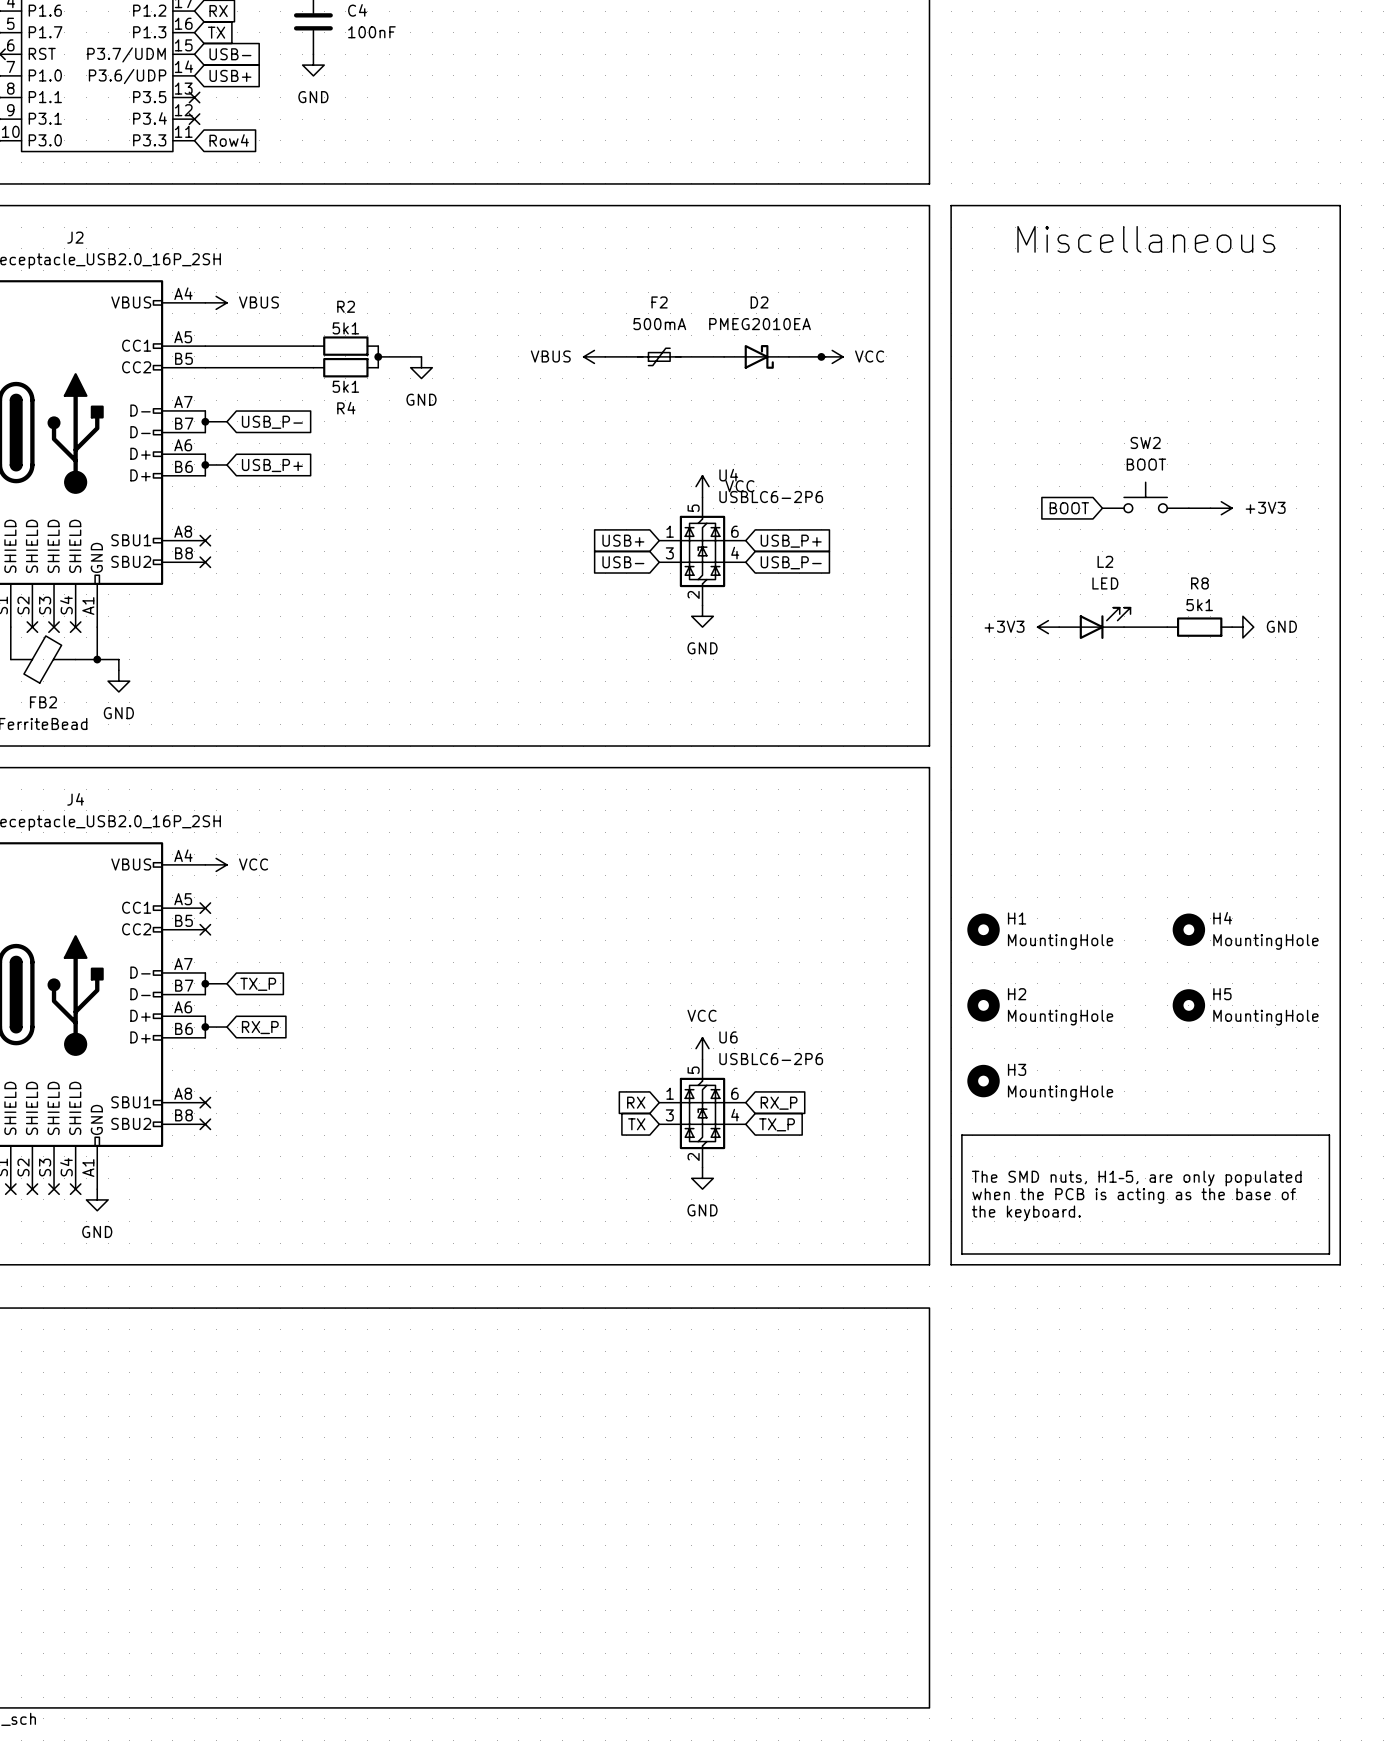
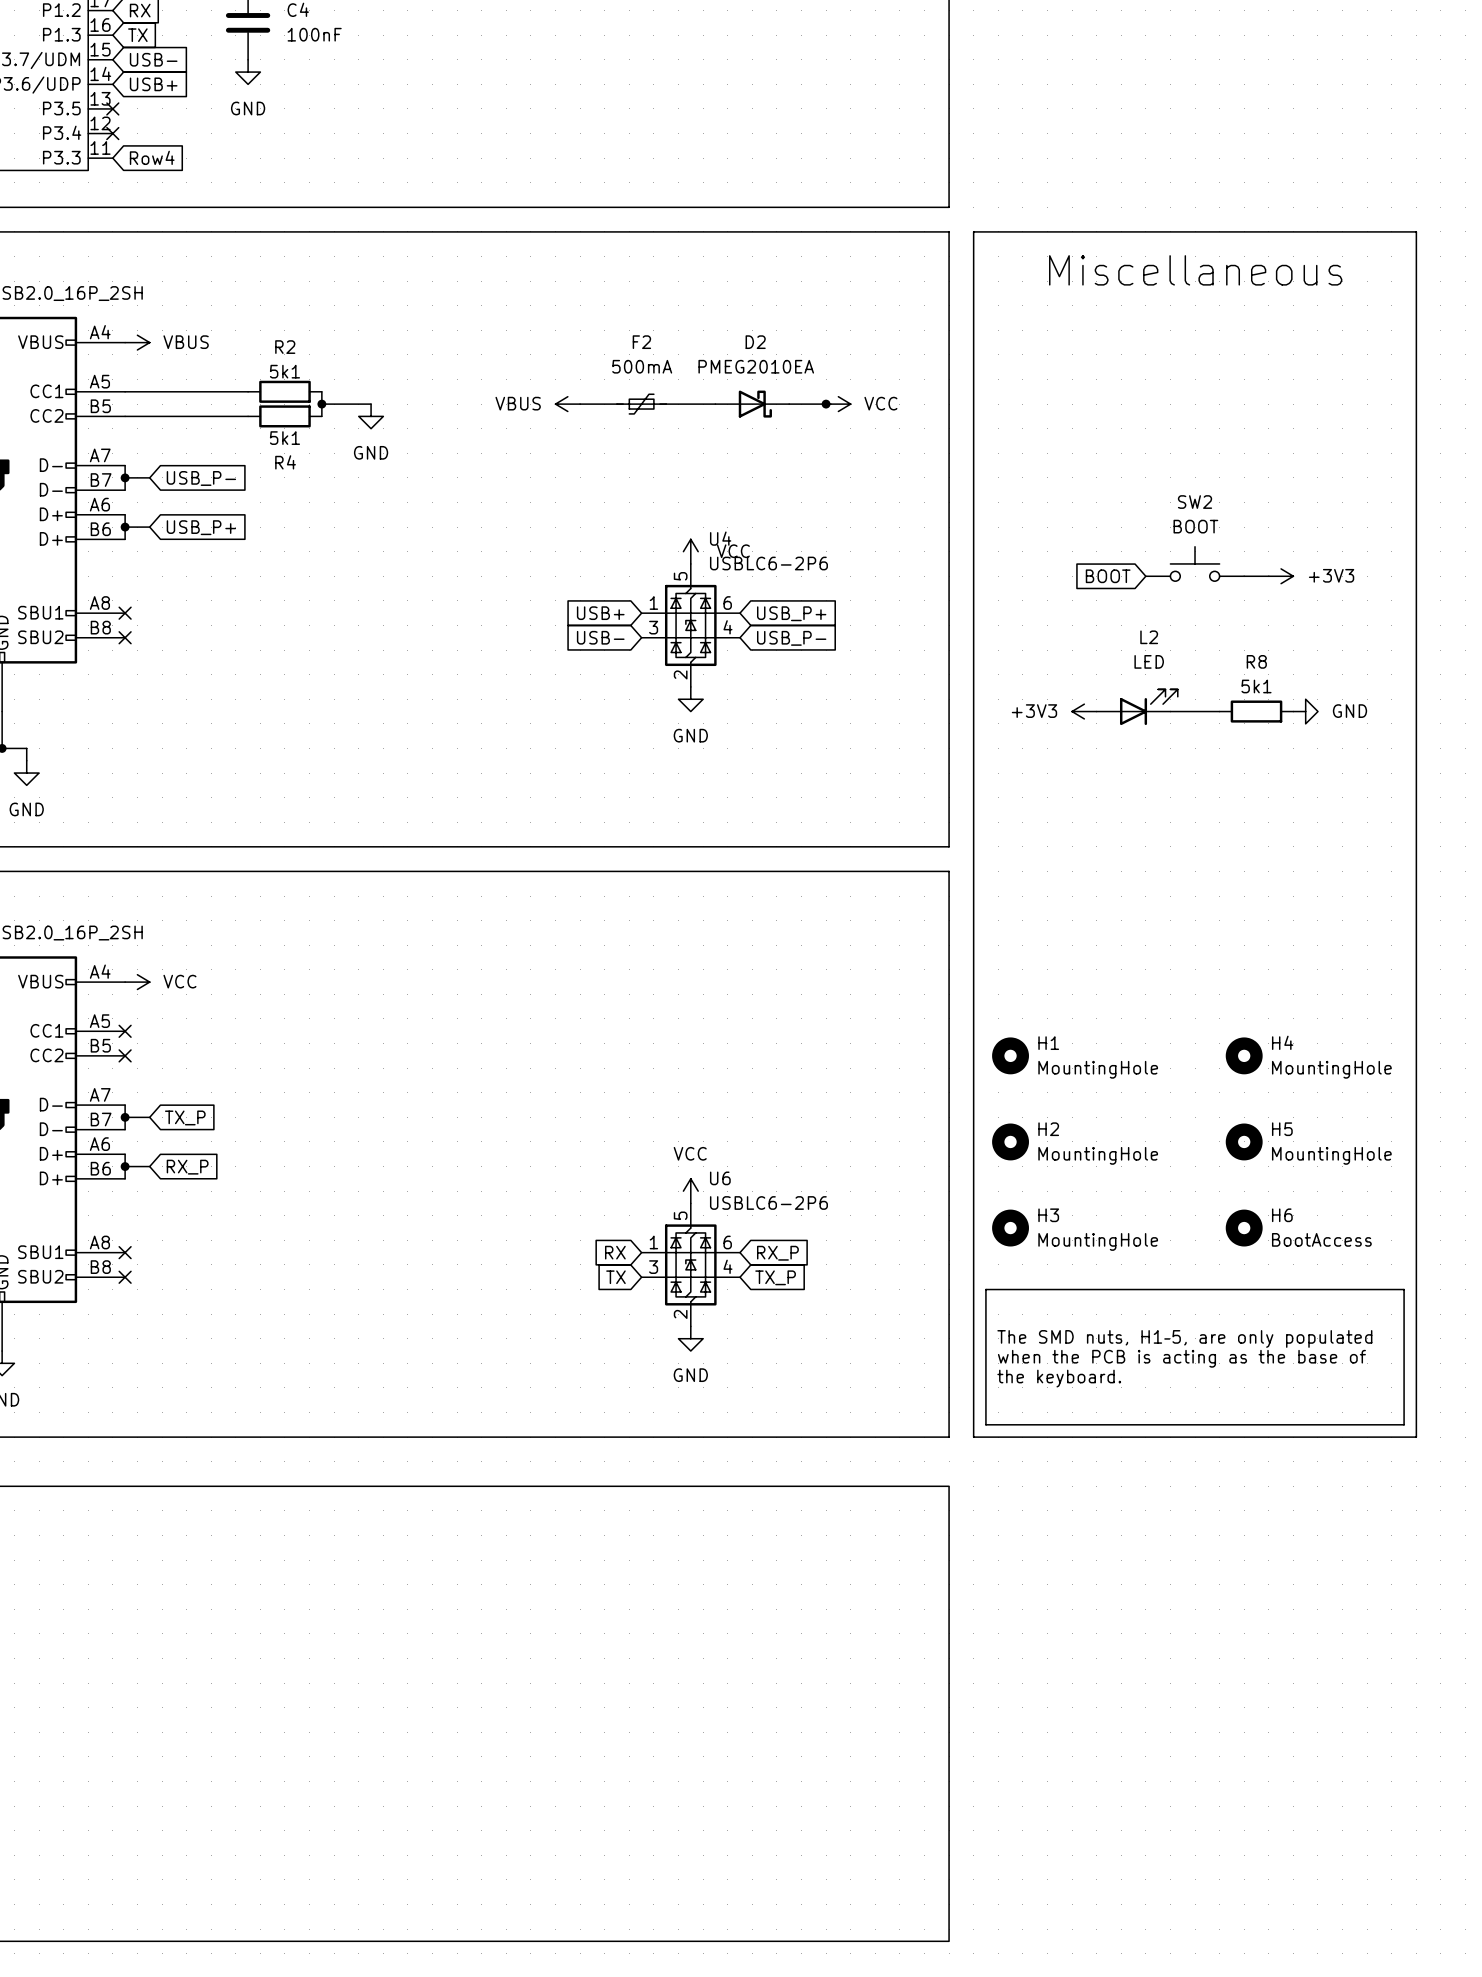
H6: none -> BootAccess (1244, 1228)

